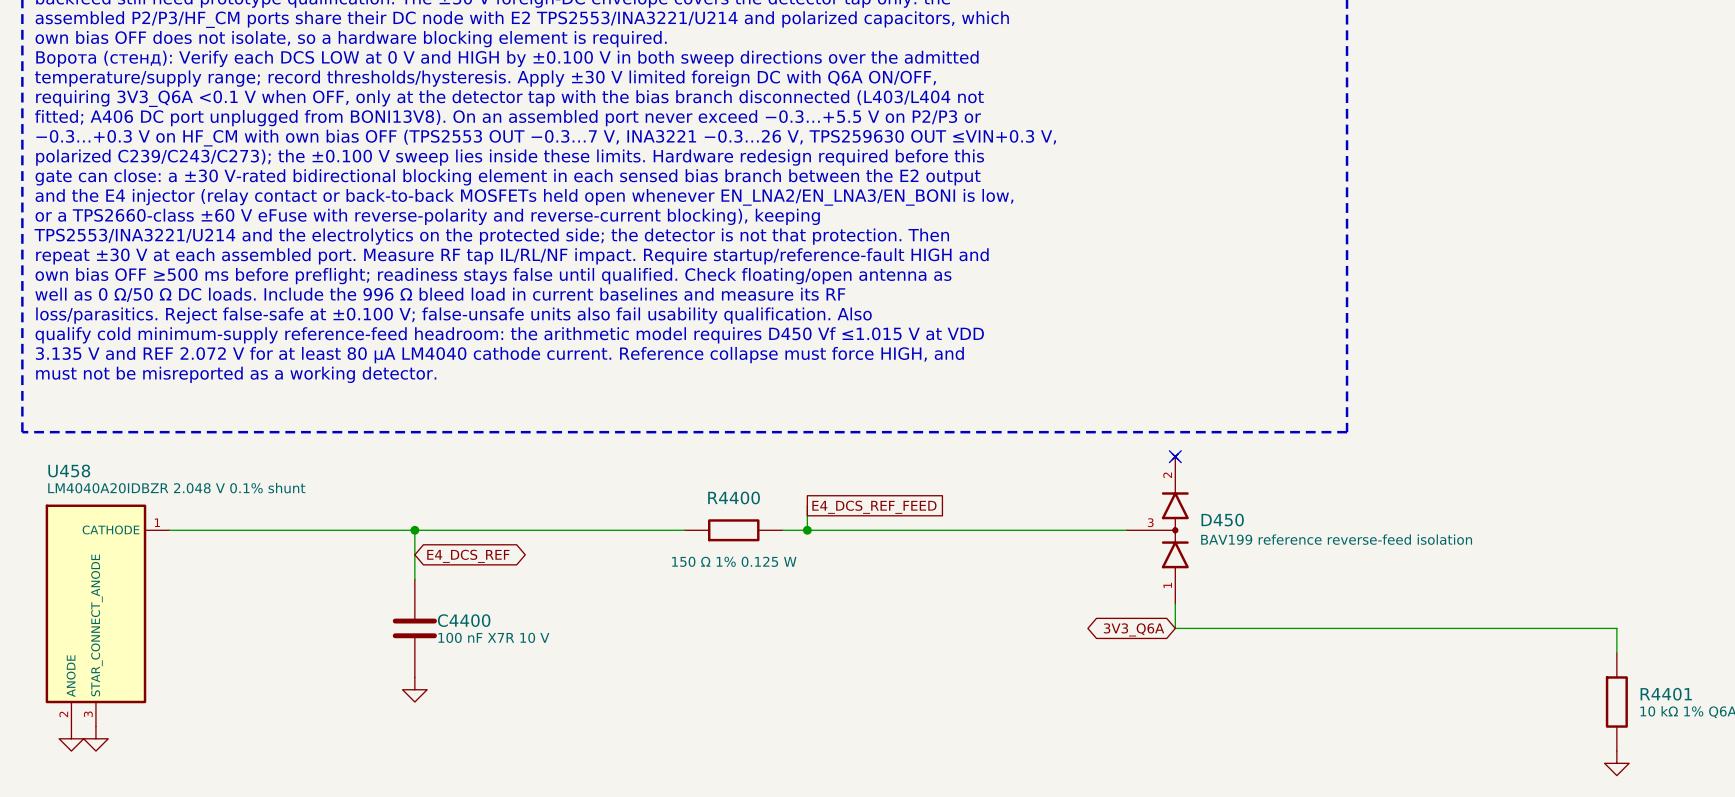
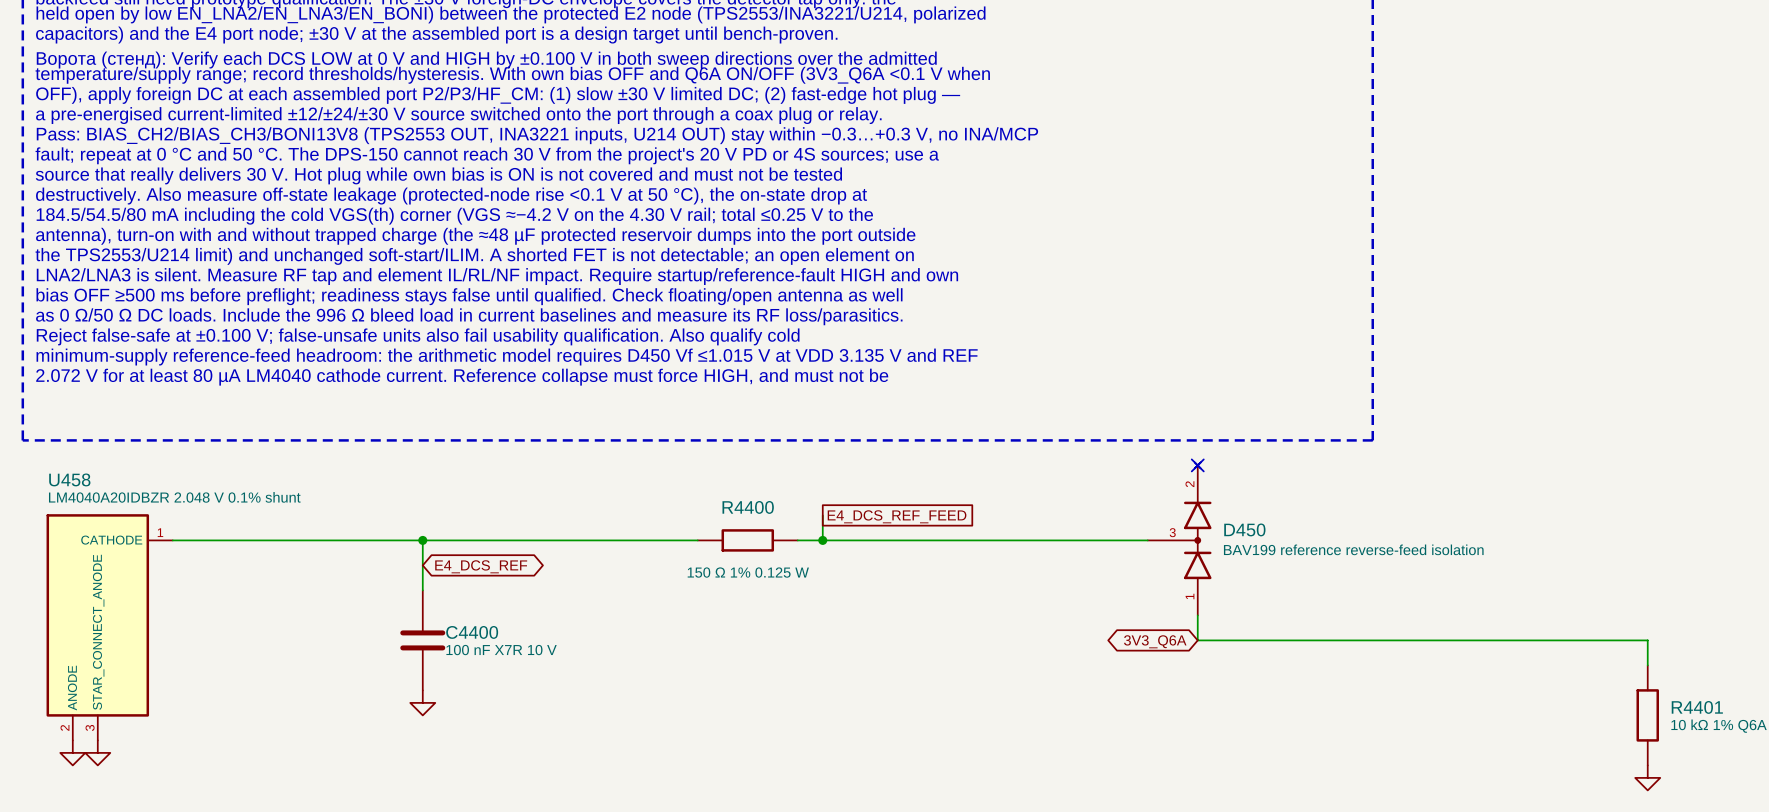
text: assembled P2/P3/HF_CM ports share their DC node with E2 TPS2553/INA3221/U214 and polarized capacitors, which (522, 19) -> held open by low EN_LNA2/EN_LNA3/EN_BONI) between the protected E2 node (TPS2553/INA3221/U214, polarized (511, 14)
text: own bias OFF does not isolate, so a hardware blocking element is required. (351, 39) -> capacitors) and the E4 port node; ±30 V at the assembled port is a design target until bench-proven. (436, 35)
text: temperature/supply range; record thresholds/hysteresis. Apply ±30 V limited foreign DC with Q6A ON/OFF, (485, 78) -> temperature/supply range; record thresholds/hysteresis. With own bias OFF and Q6A ON/OFF (3V3_Q6A <0.1 V when (512, 75)
text: requiring 3V3_Q6A <0.1 V when OFF, only at the detector tap with the bias branch disconnected (L403/L404 not (509, 98) -> OFF), apply foreign DC at each assembled port P2/P3/HF_CM: (1) slow ±30 V limited DC; (2) fast-edge hot plug — (498, 95)
text: fitted; A406 DC port unplugged from BONI13V8). On an assembled port never exceed −0.3…+5.5 V on P2/P3 or (508, 118) -> a pre-energised current-limited ±12/±24/±30 V source switched onto the port through a coax plug or relay. (458, 115)
text: −0.3…+0.3 V on HF_CM with own bias OFF (TPS2553 OUT −0.3…7 V, INA3221 −0.3…26 V, TPS259630 OUT ≤VIN+0.3 V, (546, 138) -> Pass: BIAS_CH2/BIAS_CH3/BONI13V8 (TPS2553 OUT, INA3221 inputs, U214 OUT) stay within −0.3…+0.3 V, no INA/MCP (537, 135)
text: polarized C239/C243/C273); the ±0.100 V sweep lies inside these limits. Hardware redesign required before this (510, 157) -> fault; repeat at 0 °C and 50 °C. The DPS-150 cannot reach 30 V from the project's 20 V PD or 4S sources; use a (487, 155)
text: gate can close: a ±30 V-rated bidirectional blocking element in each sensed bias branch between the E2 output (508, 177) -> source that really delivers 30 V. Hot plug while own bias is ON is not covered and must not be tested (438, 175)
text: and the E4 injector (relay contact or back-to-back MOSFETs held open whenever EN_LNA2/EN_LNA3/EN_BONI is low, (524, 197) -> destructively. Also measure off-state leakage (protected-node rise <0.1 V at 50 °C), the on-state drop at (451, 196)
text: or a TPS2660-class ±60 V eFuse with reverse-polarity and reverse-current blocking), keeping (427, 216) -> 184.5/54.5/80 mA including the cold VGS(th) corner (VGS ≈−4.2 V on the 4.30 V rail; total ≤0.25 V to the (454, 216)
text: TPS2553/INA3221/U214 and the electrolytics on the protected side; the detector is not that protection. Then (491, 236) -> antenna), turn-on with and without trapped charge (the ≈48 µF protected reservoir dumps into the port outside (475, 236)
text: repeat ±30 V at each assembled port. Measure RF tap IL/RL/NF impact. Require startup/reference-fault HIGH and (512, 256) -> the TPS2553/U214 limit) and unchanged soft-start/ILIM. A shorted FET is not detectable; an open element on (474, 256)
text: own bias OFF ≥500 ms before preflight; readiness stays false until qualified. Check floating/open antenna as (493, 276) -> LNA2/LNA3 is silent. Measure RF tap and element IL/RL/NF impact. Require startup/reference-fault HIGH and own (497, 276)
text: well as 0 Ω/50 Ω DC loads. Include the 996 Ω bleed load in current baselines and measure its RF (440, 294) -> bias OFF ≥500 ms before preflight; readiness stays false until qualified. Check floating/open antenna as well (469, 296)
text: loss/parasitics. Reject false-safe at ±0.100 V; false-unsafe units also fail usability qualification. Also (453, 315) -> as 0 Ω/50 Ω DC loads. Include the 996 Ω bleed load in current baselines and measure its RF loss/parasitics. (469, 316)
text: qualify cold minimum-supply reference-feed headroom: the arithmetic model requires D450 Vf ≤1.015 V at VDD (509, 335) -> Reject false-safe at ±0.100 V; false-unsafe units also fail usability qualification. Also qualify cold (418, 336)
text: 3.135 V and REF 2.072 V for at least 80 µA LM4040 cathode current. Reference collapse must force HIGH, and (499, 355) -> minimum-supply reference-feed headroom: the arithmetic model requires D450 Vf ≤1.015 V at VDD 3.135 V and REF (507, 357)
text: must not be misreported as a working detector. (236, 374) -> 2.072 V for at least 80 µA LM4040 cathode current. Reference collapse must force HIGH, and must not be (462, 377)

